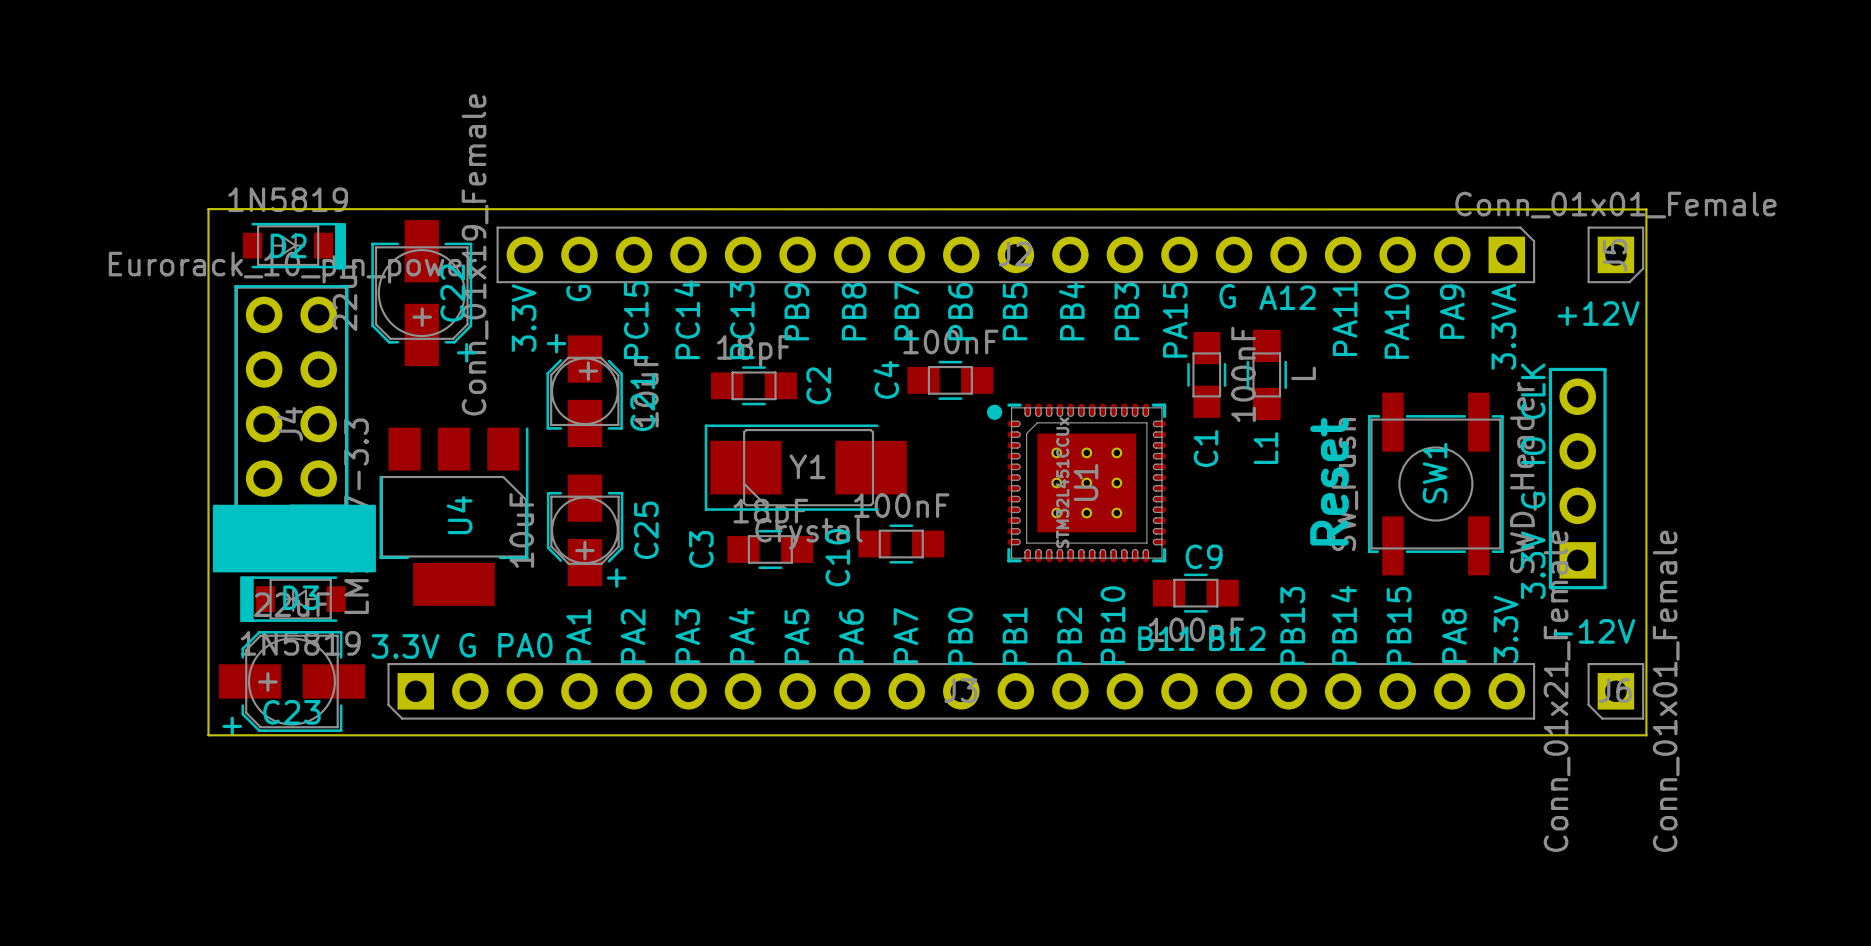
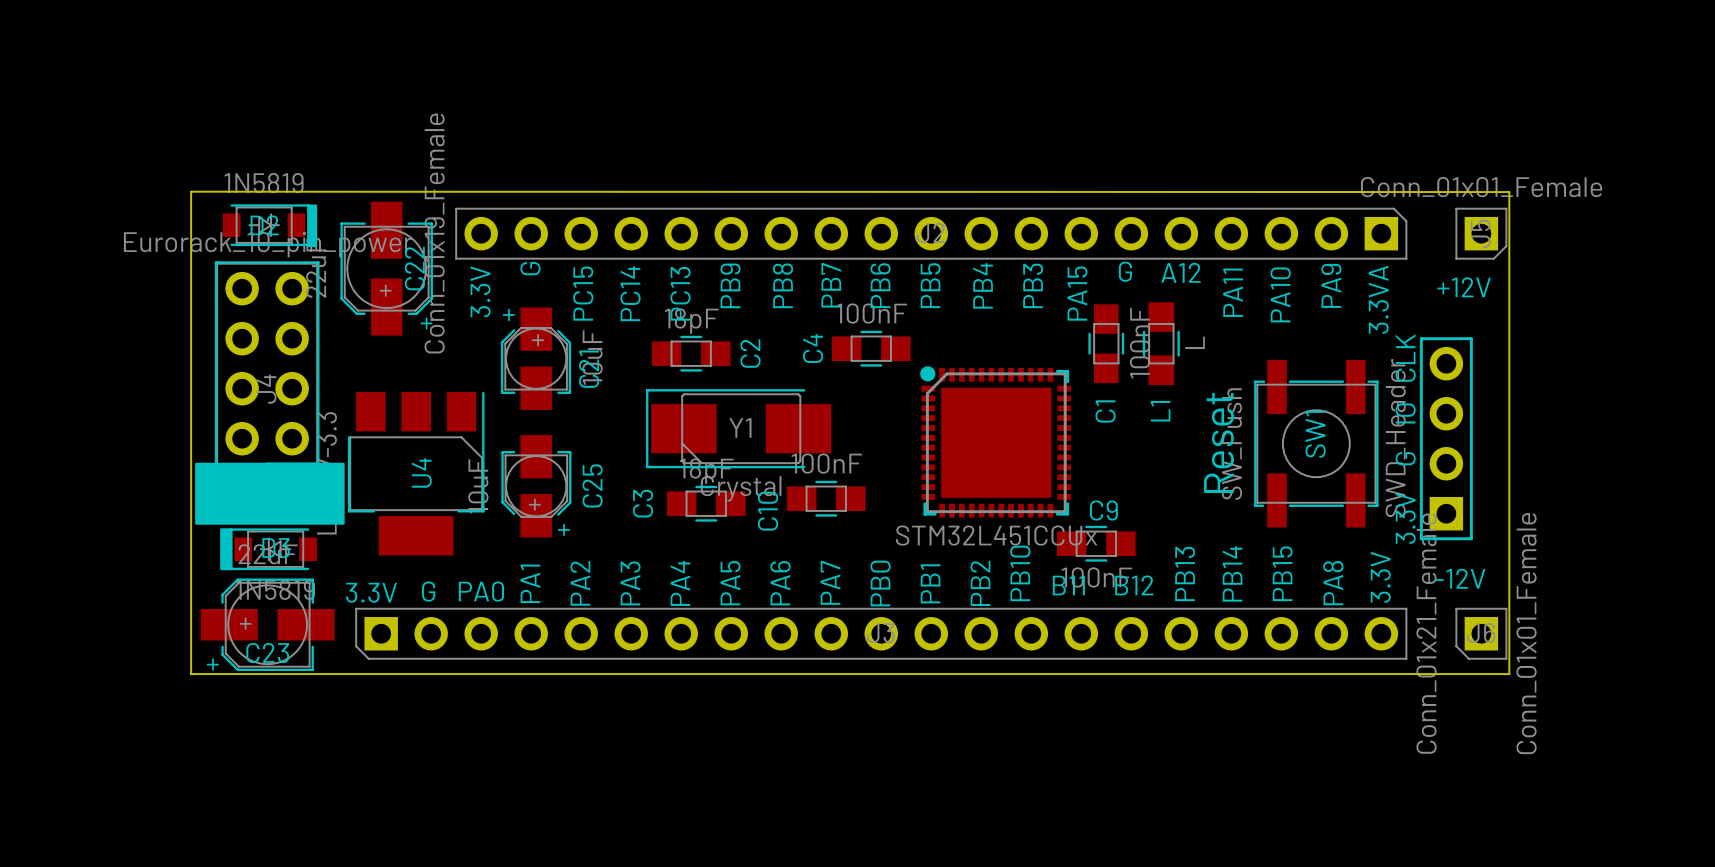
drawing: [986, 404, 1003, 420] -> none
U1: STM32L451CCUx (1086, 482) -> none
part: none -> STM32L451CCUx (995, 441)

